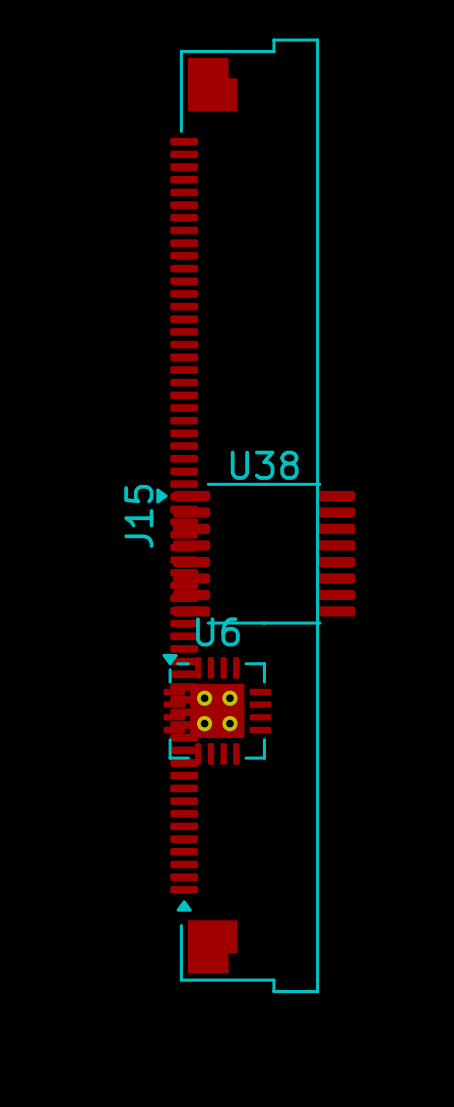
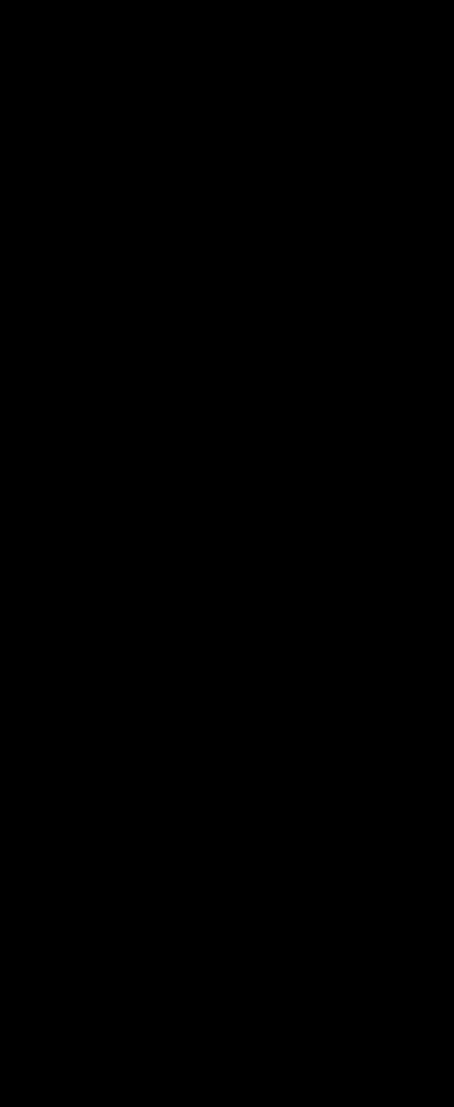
J15: (244, 515) -> none
U38: (255, 553) -> none
U6: (216, 709) -> none

